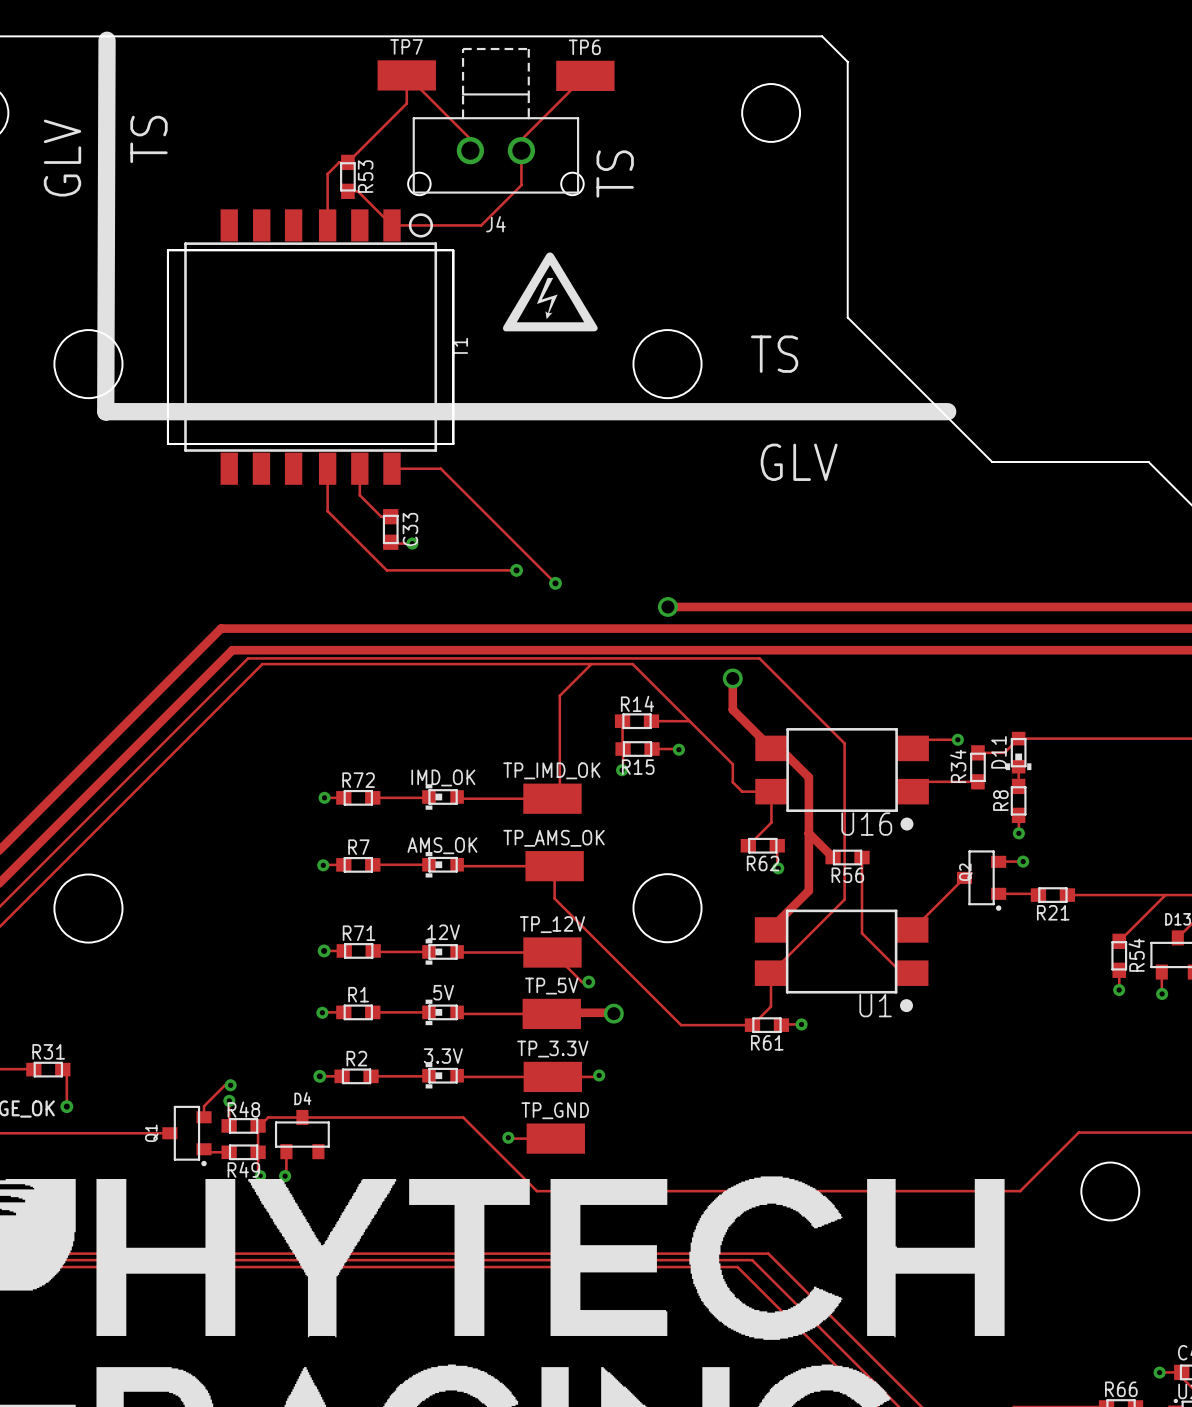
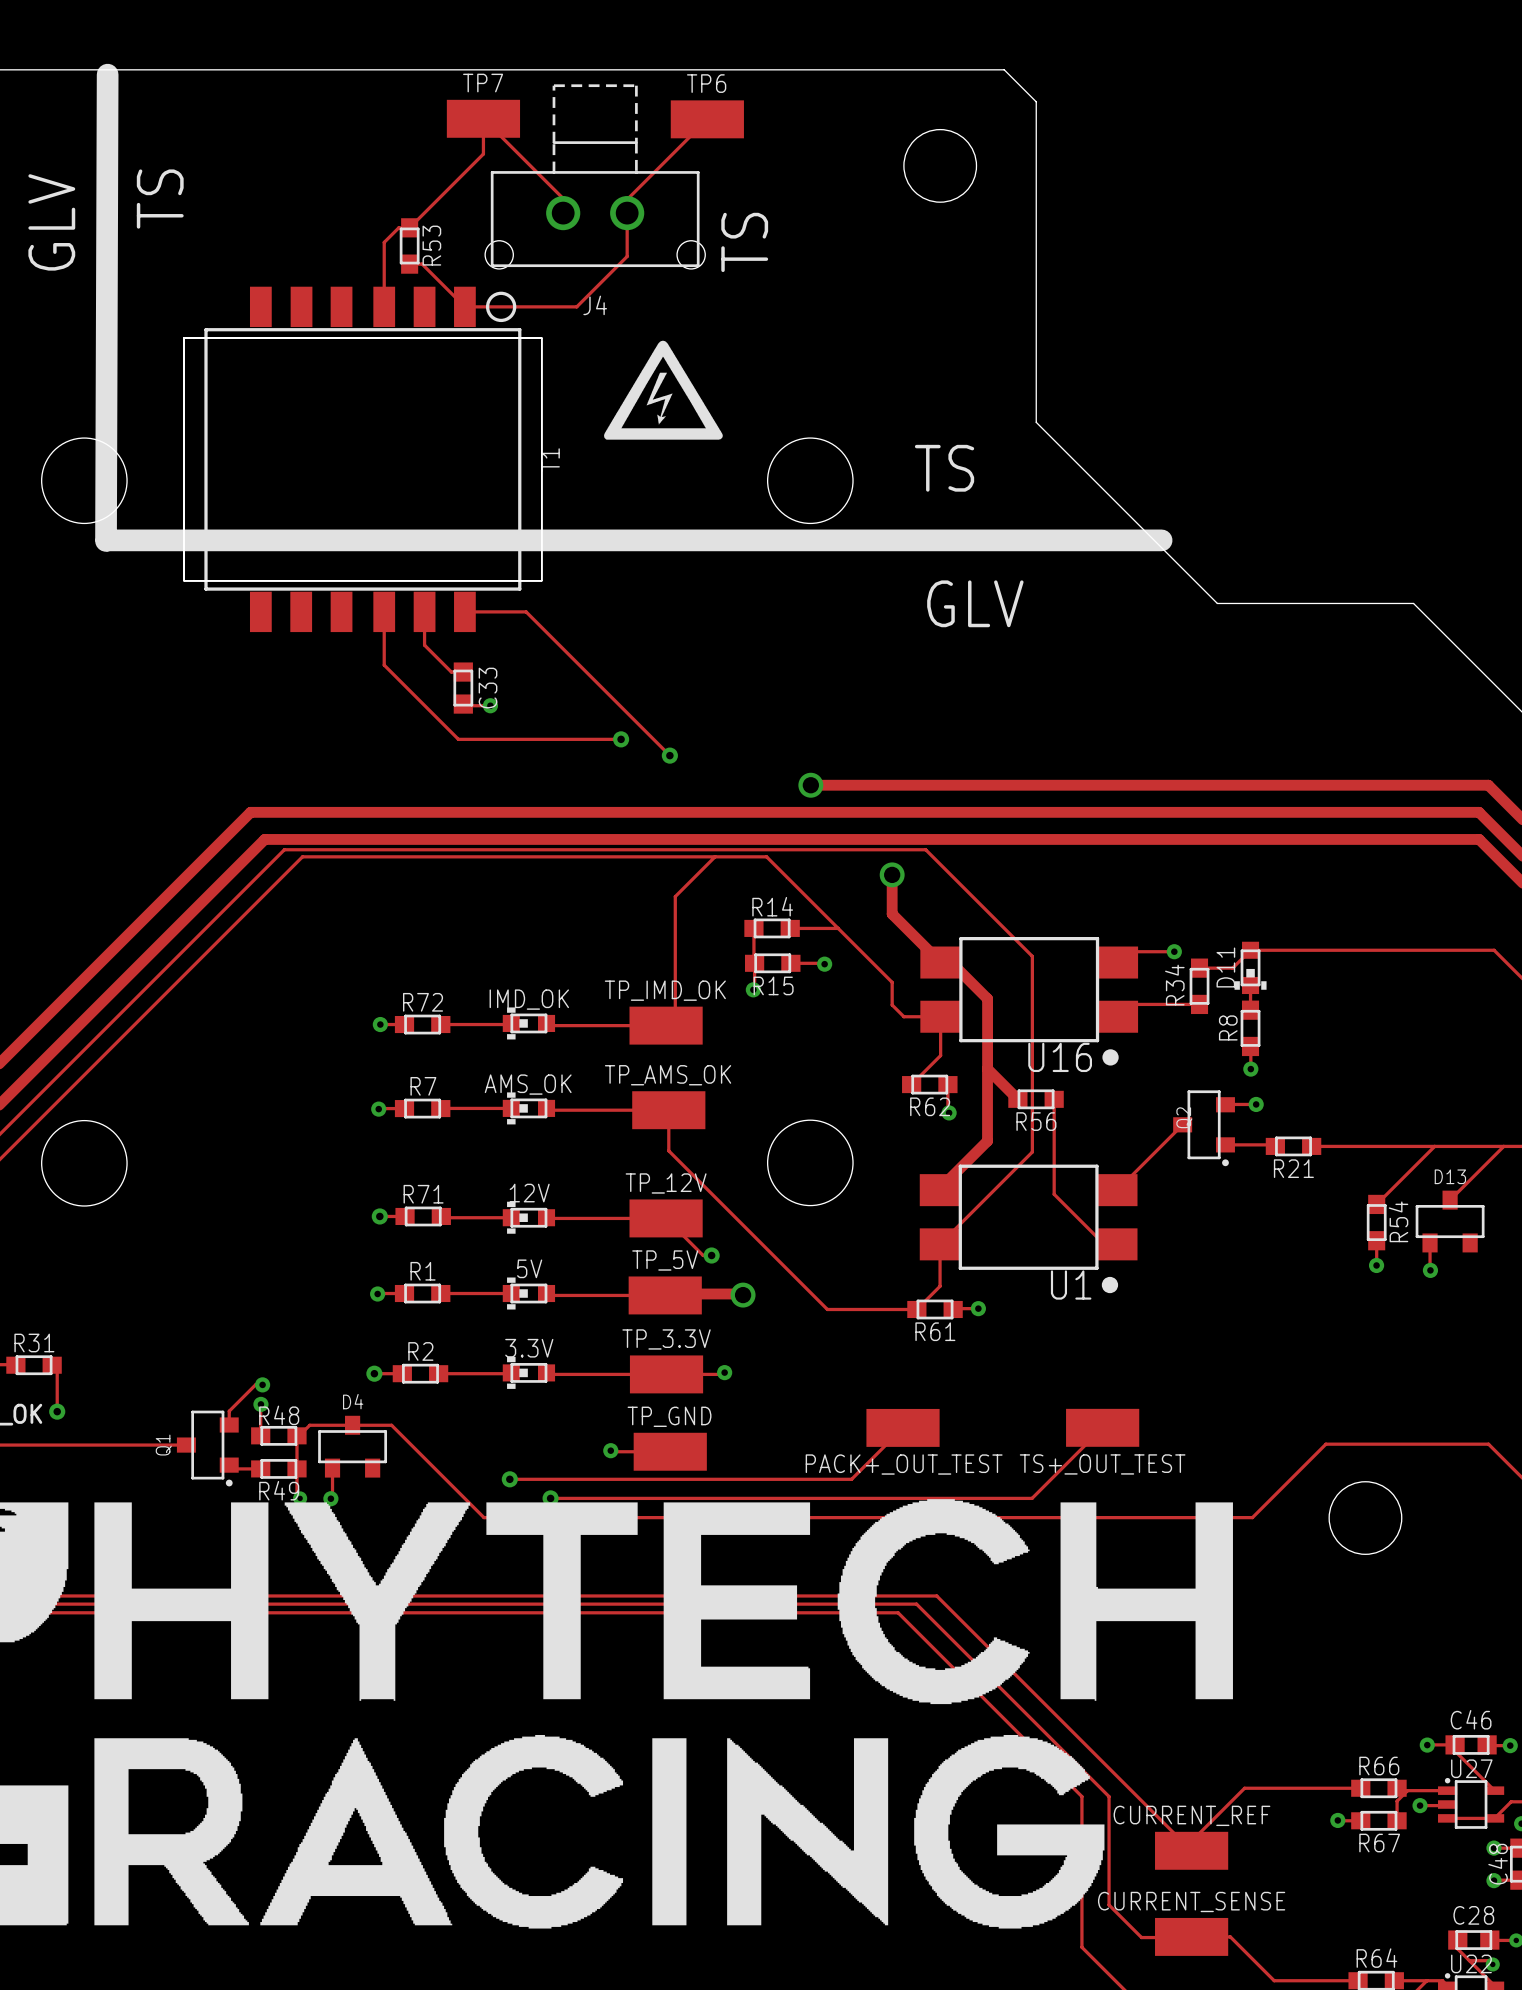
track: (333, 1117) (463, 1117) (536, 1191) -> (391, 1425) (483, 1517) (646, 1517)
track: none -> (903, 1427) (851, 1479) (509, 1479)
PACK+_OUT_TEST: none -> (903, 1427)
track: none -> (1102, 1427) (1032, 1498) (550, 1498)
TS+_OUT_TEST: none -> (1102, 1427)
via: none -> (509, 1479)
via: none -> (550, 1498)

